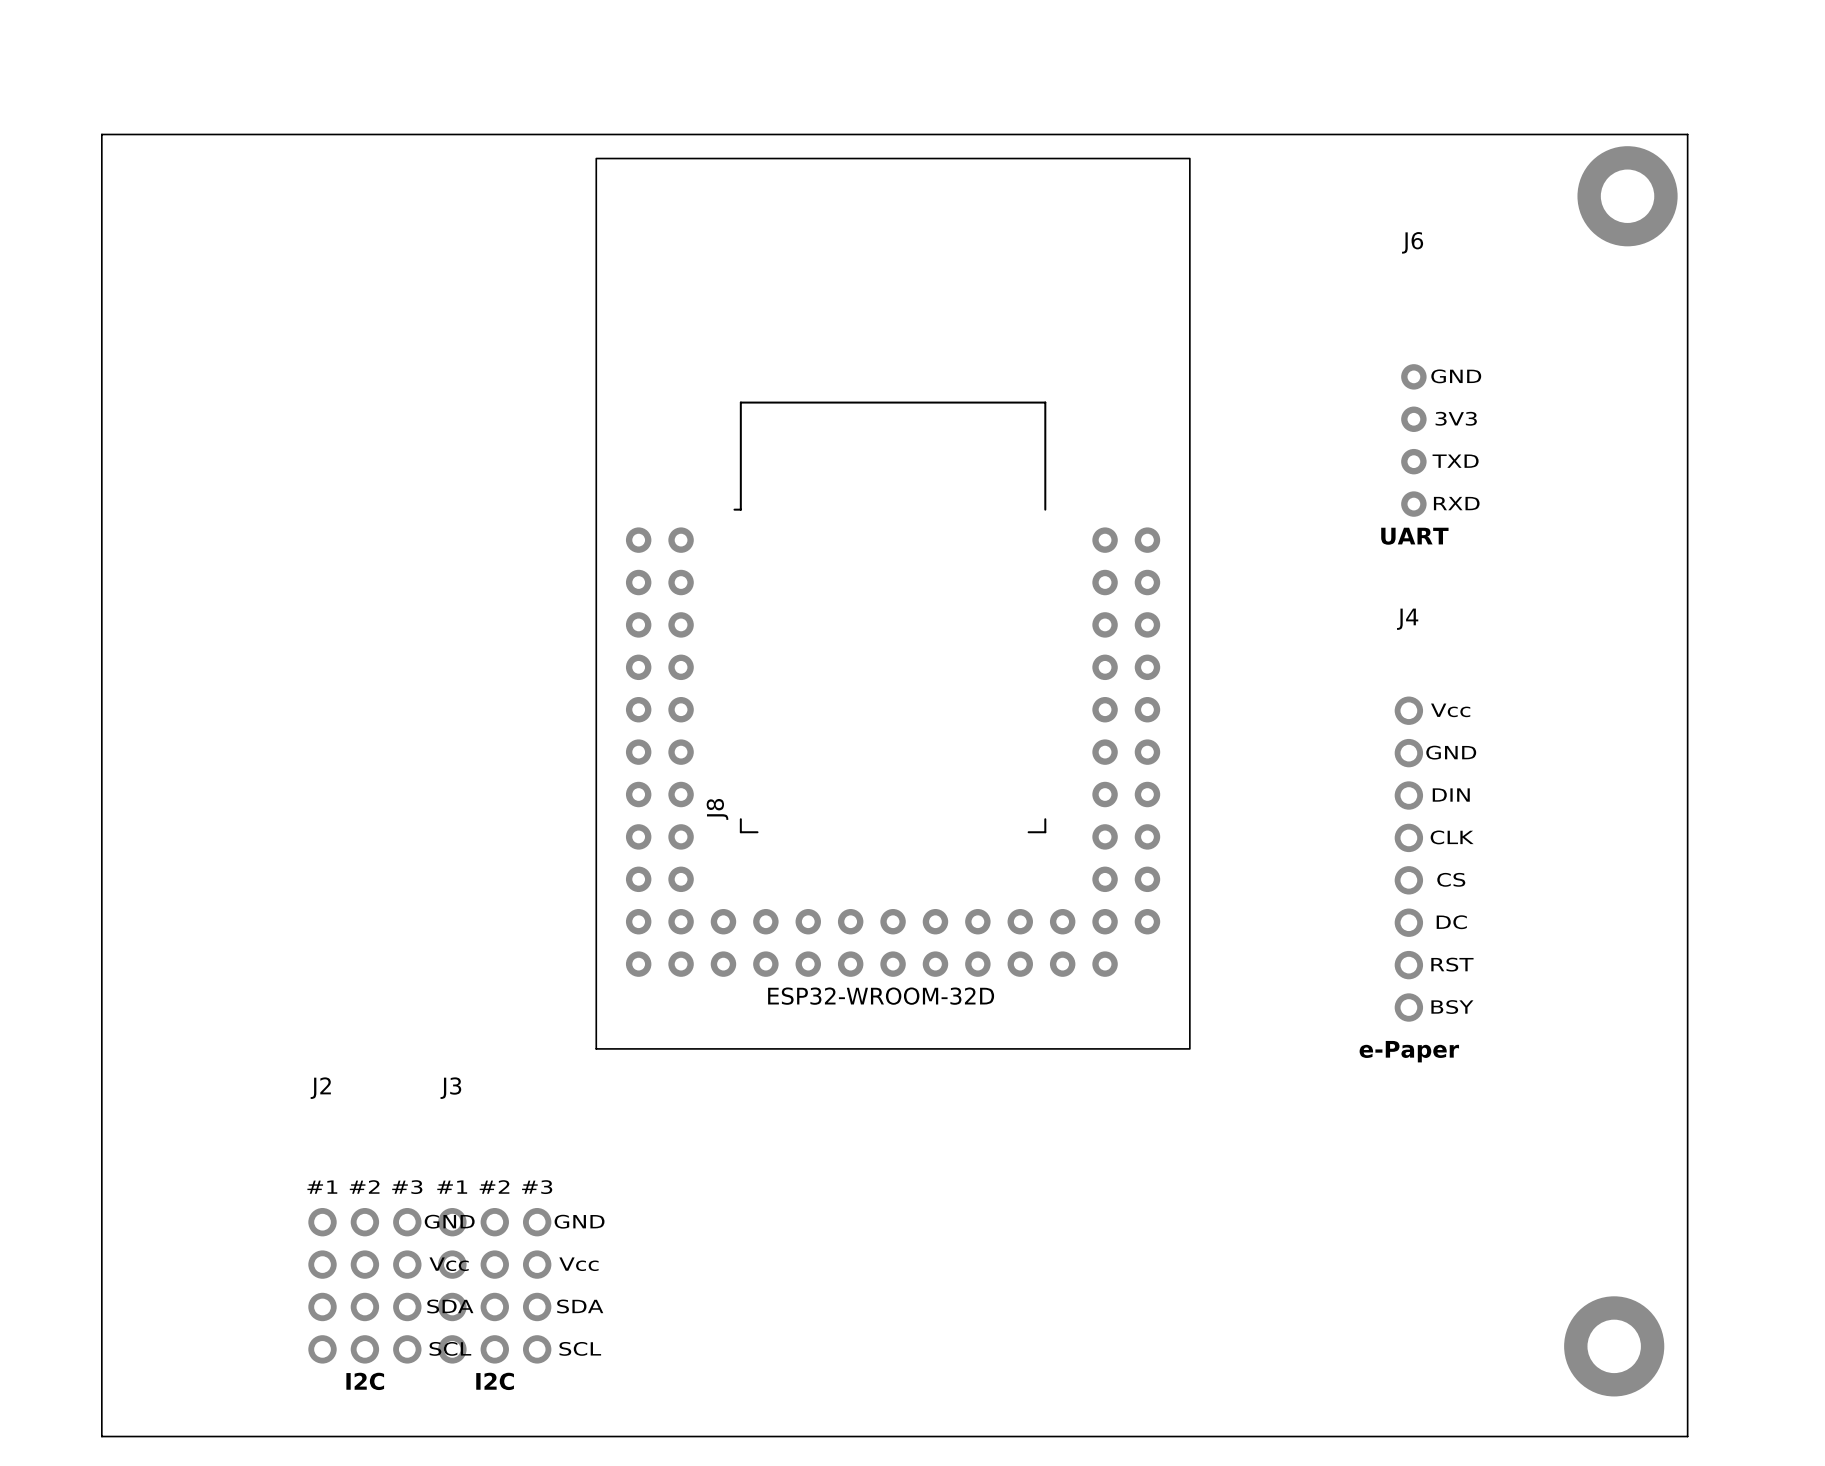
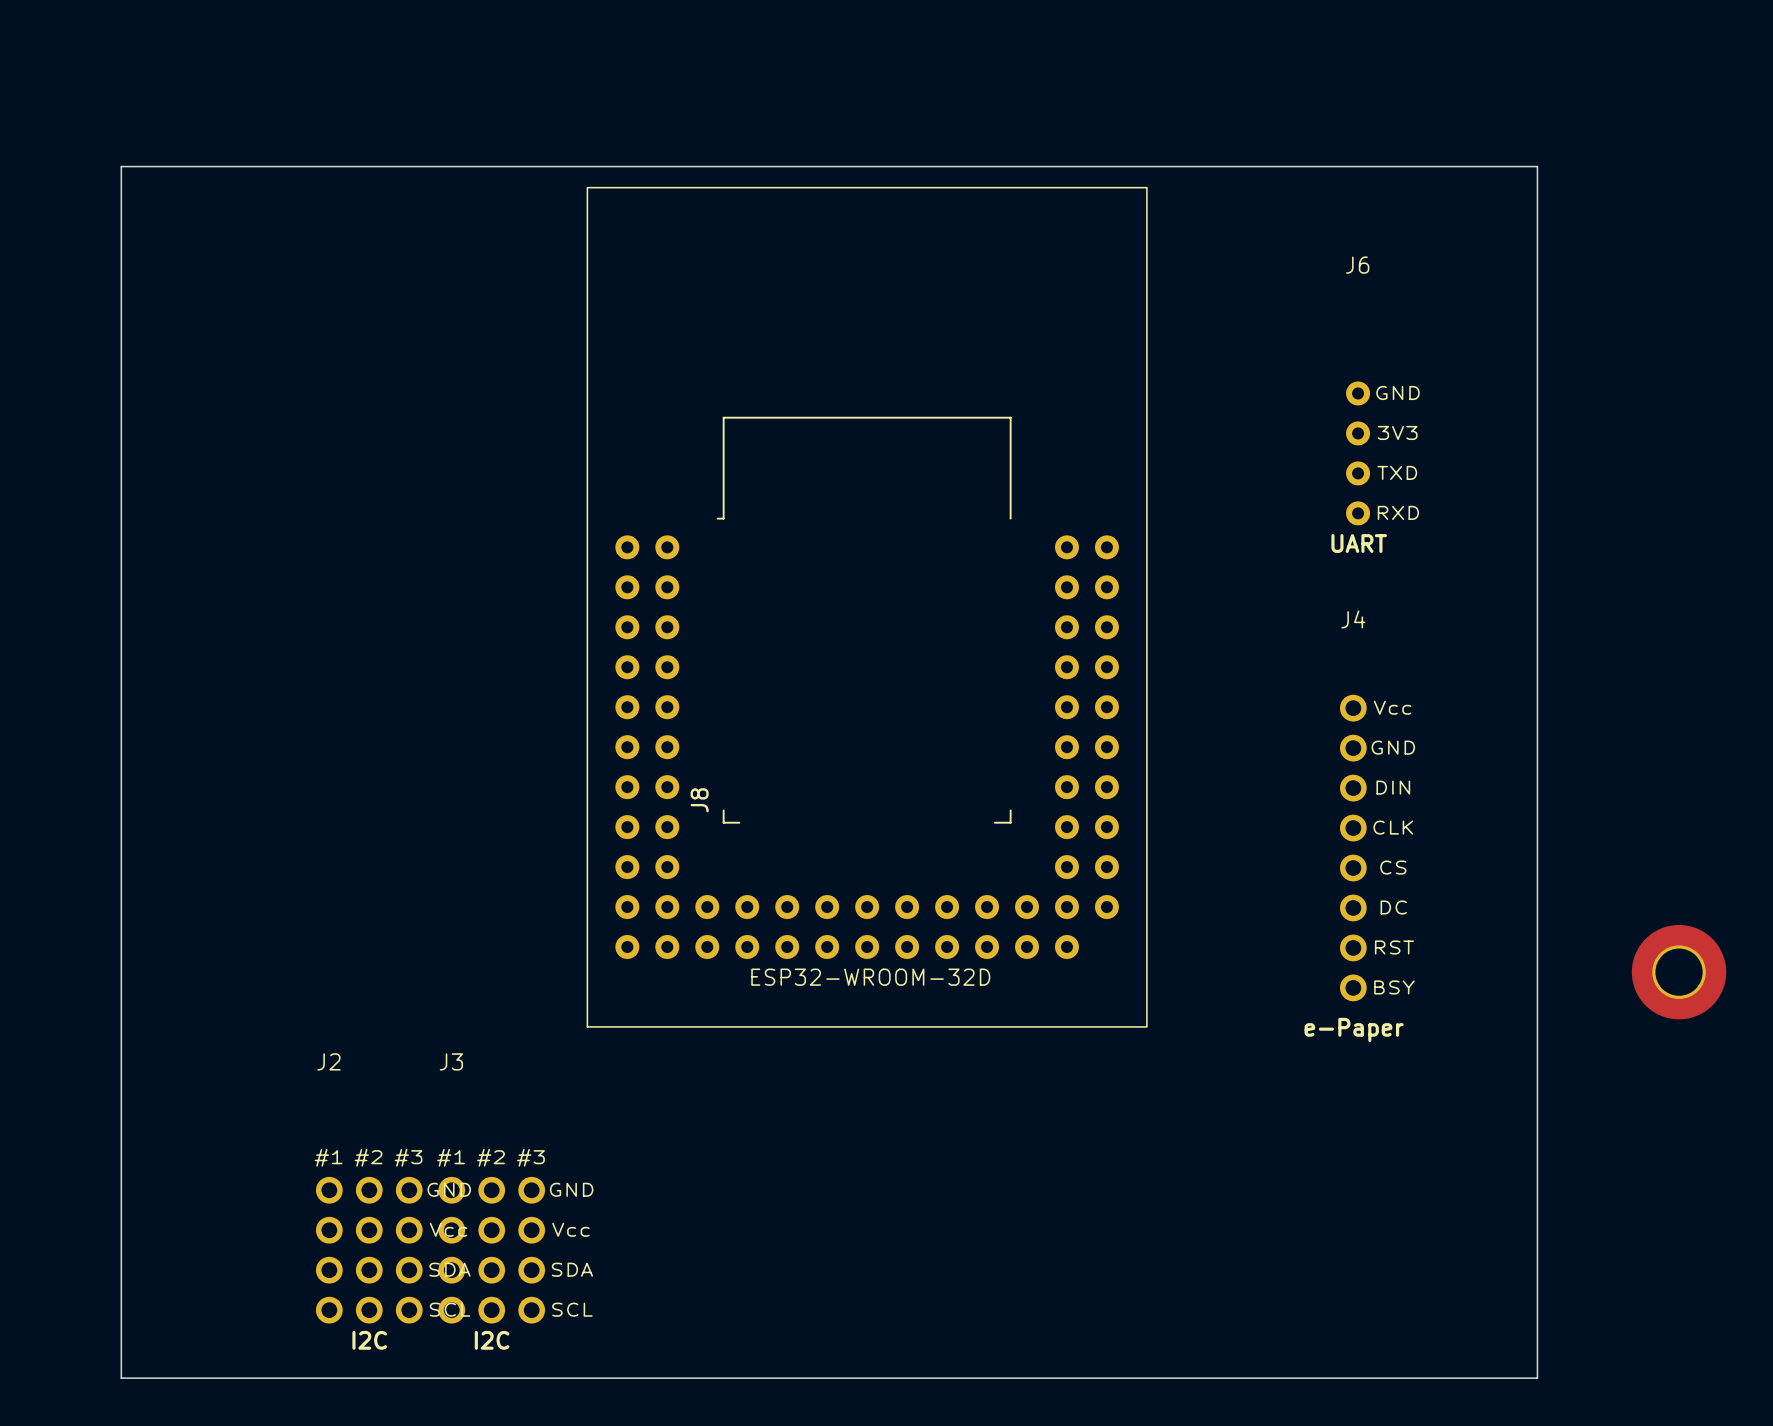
board edge: (101, 136) (101, 134) (1687, 134) (1687, 1436) (101, 1436) (101, 1421) -> (121, 166) (1537, 166) (1537, 1378) (121, 1378)
part: (1627, 196) -> none
part: none -> (1679, 972)
part: (1614, 1346) -> none

